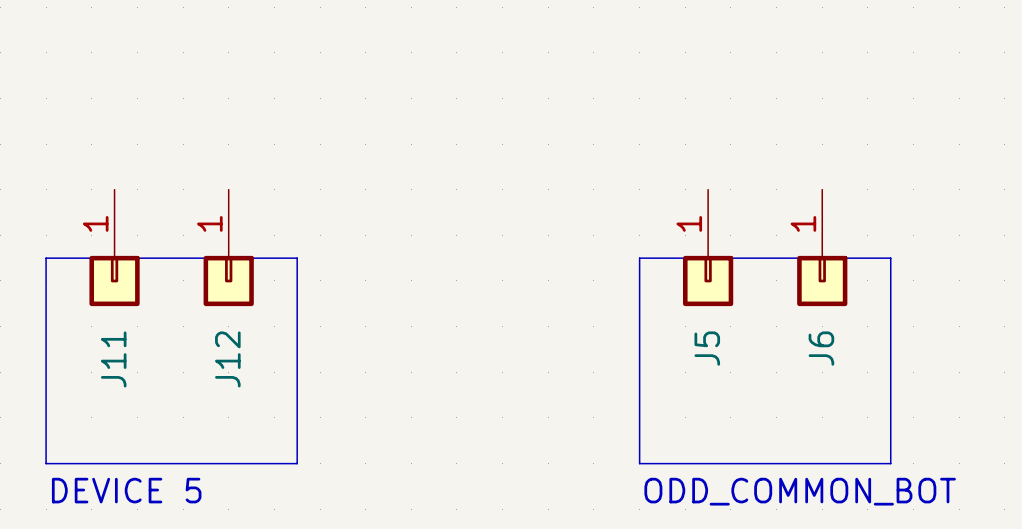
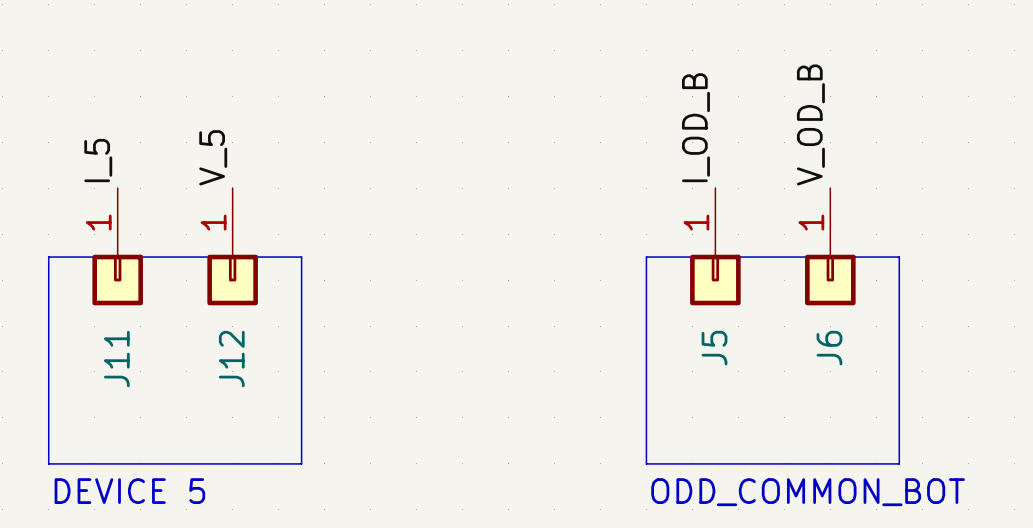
label: none -> V_OD_B (810, 124)
label: none -> I_OD_B (695, 127)
label: none -> V_5 (213, 157)
label: none -> I_5 (98, 160)

